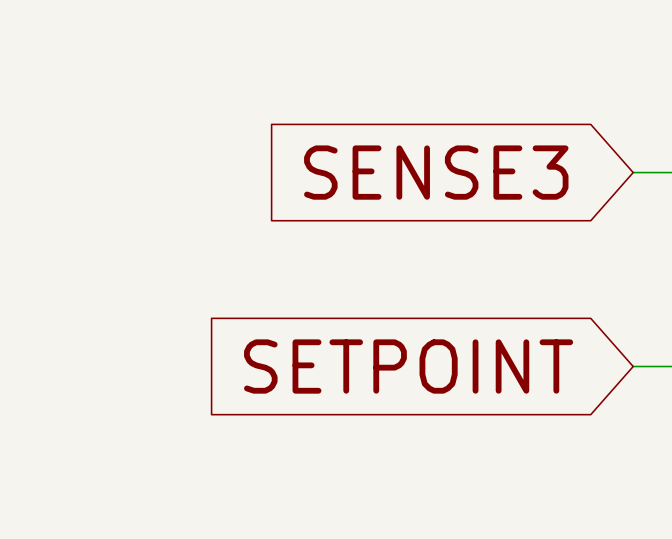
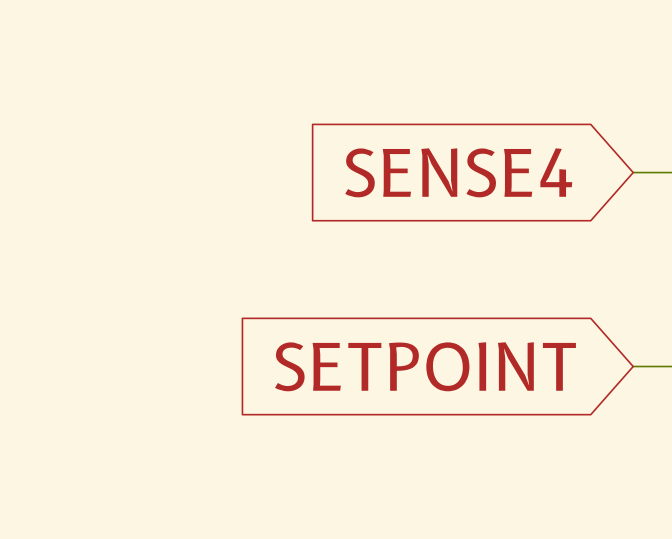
global label: SENSE3 (436, 172) -> SENSE4 (458, 172)

